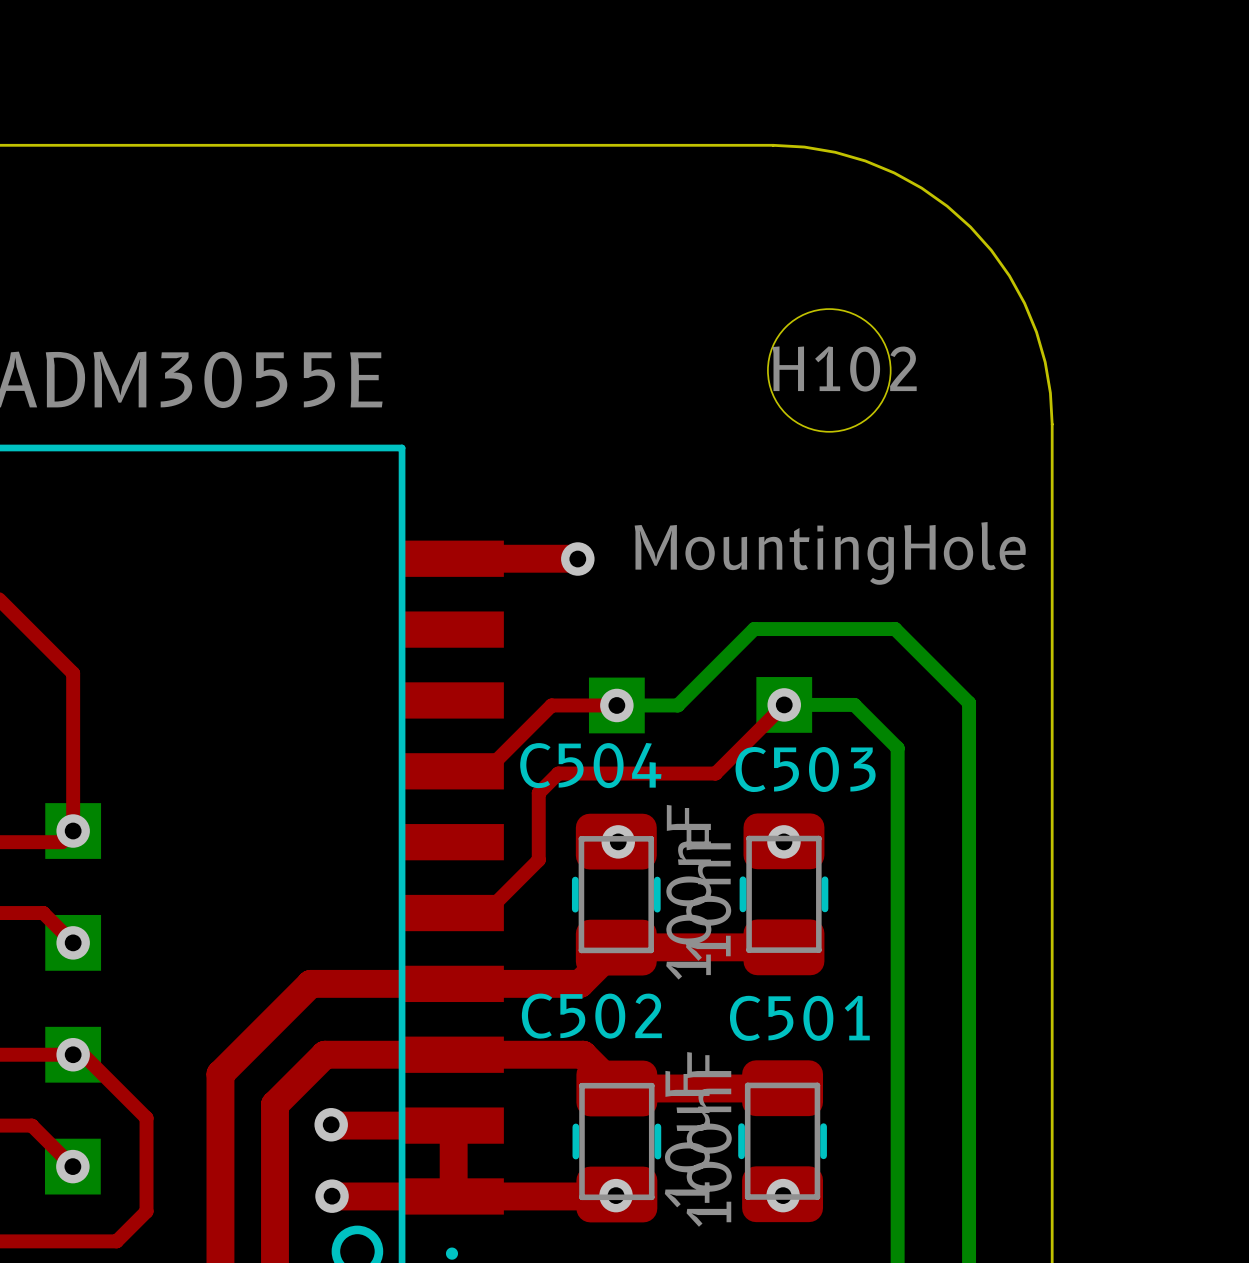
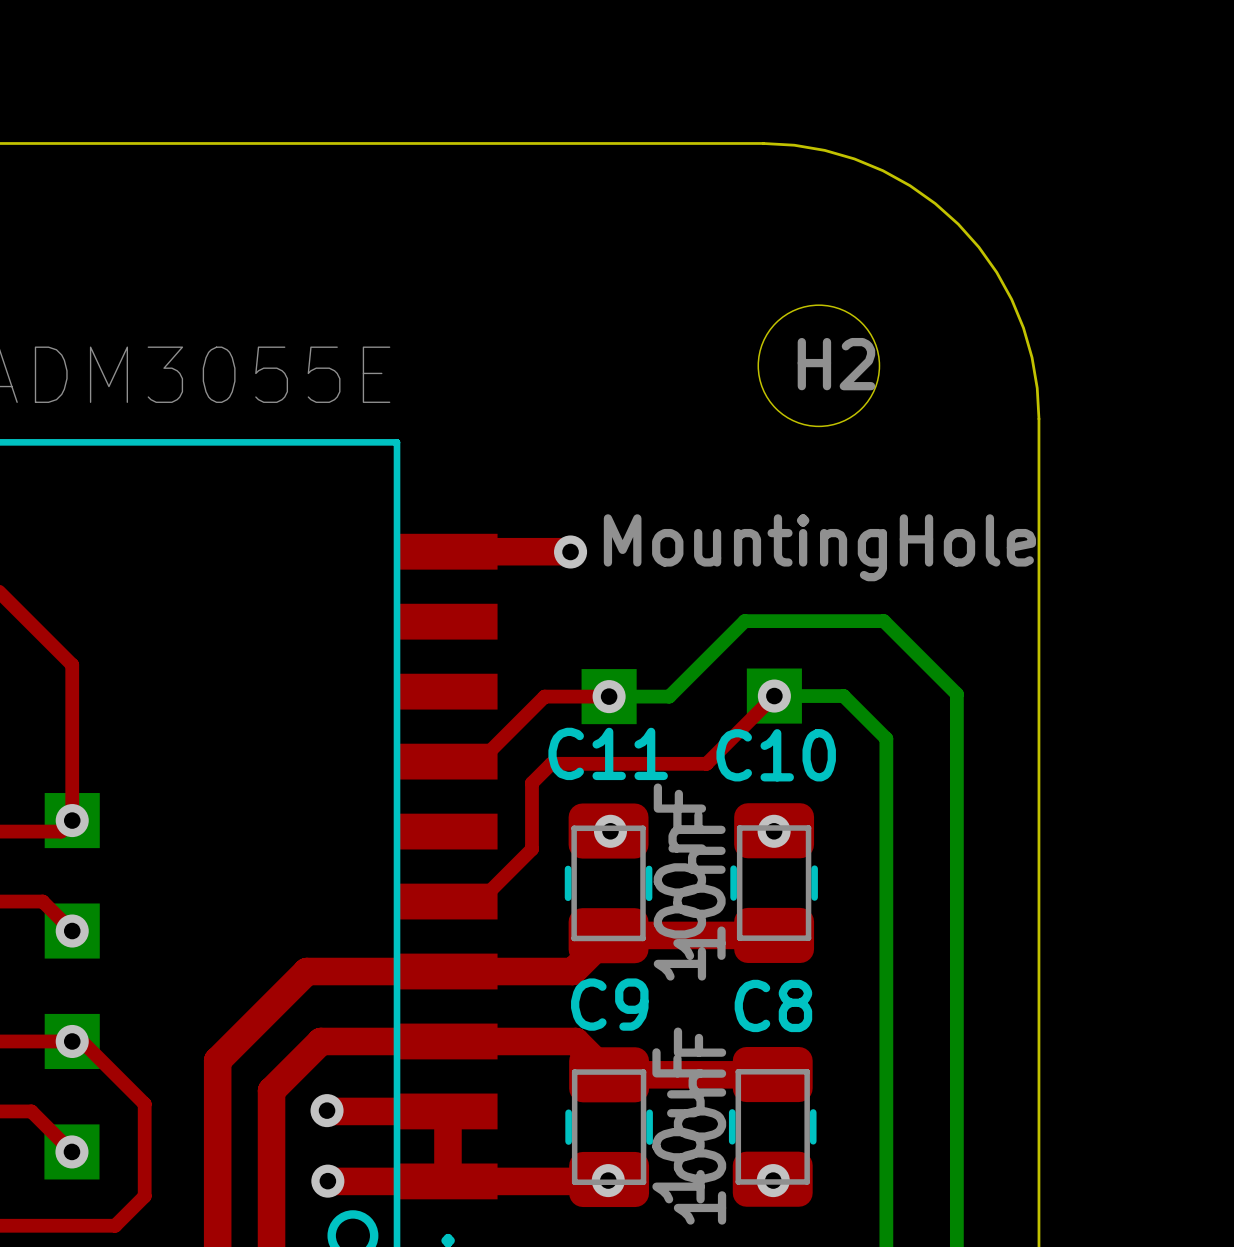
H102 name: H102 (844, 369) -> H2 (836, 364)
C504 name: C504 (590, 765) -> C11 (608, 753)
C503 name: C503 (805, 769) -> C10 (776, 755)
C502 name: C502 (591, 1016) -> C9 (609, 1004)
C501 name: C501 (799, 1018) -> C8 (773, 1005)

